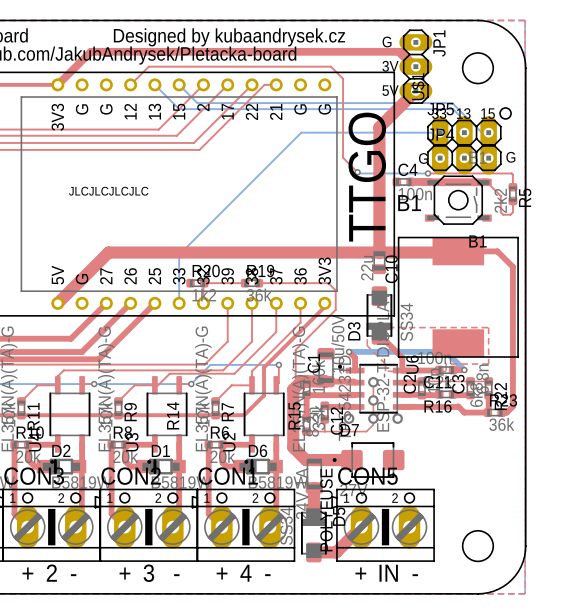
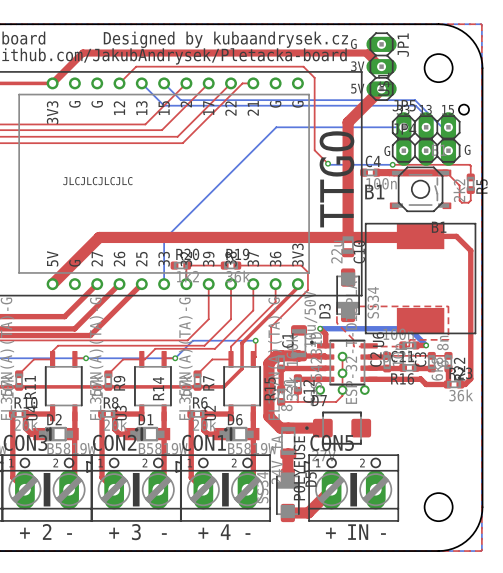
top track: (379, 334) (402, 357) (402, 370) (439, 370) -> none

